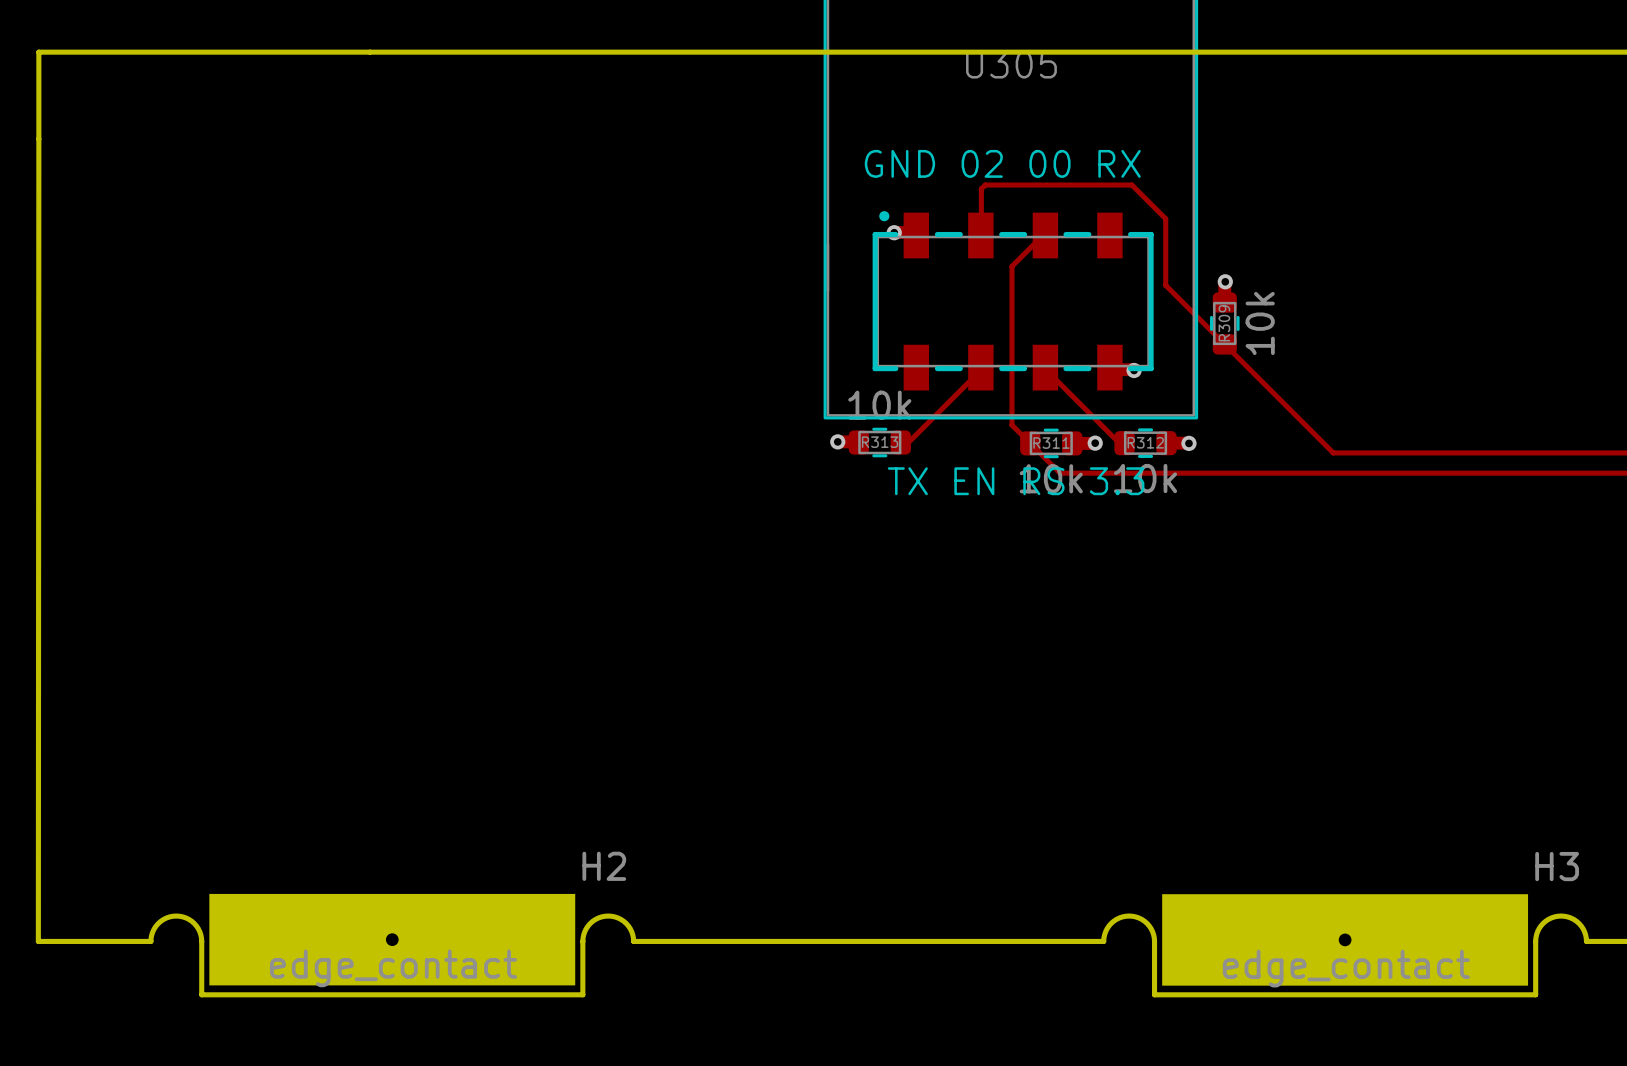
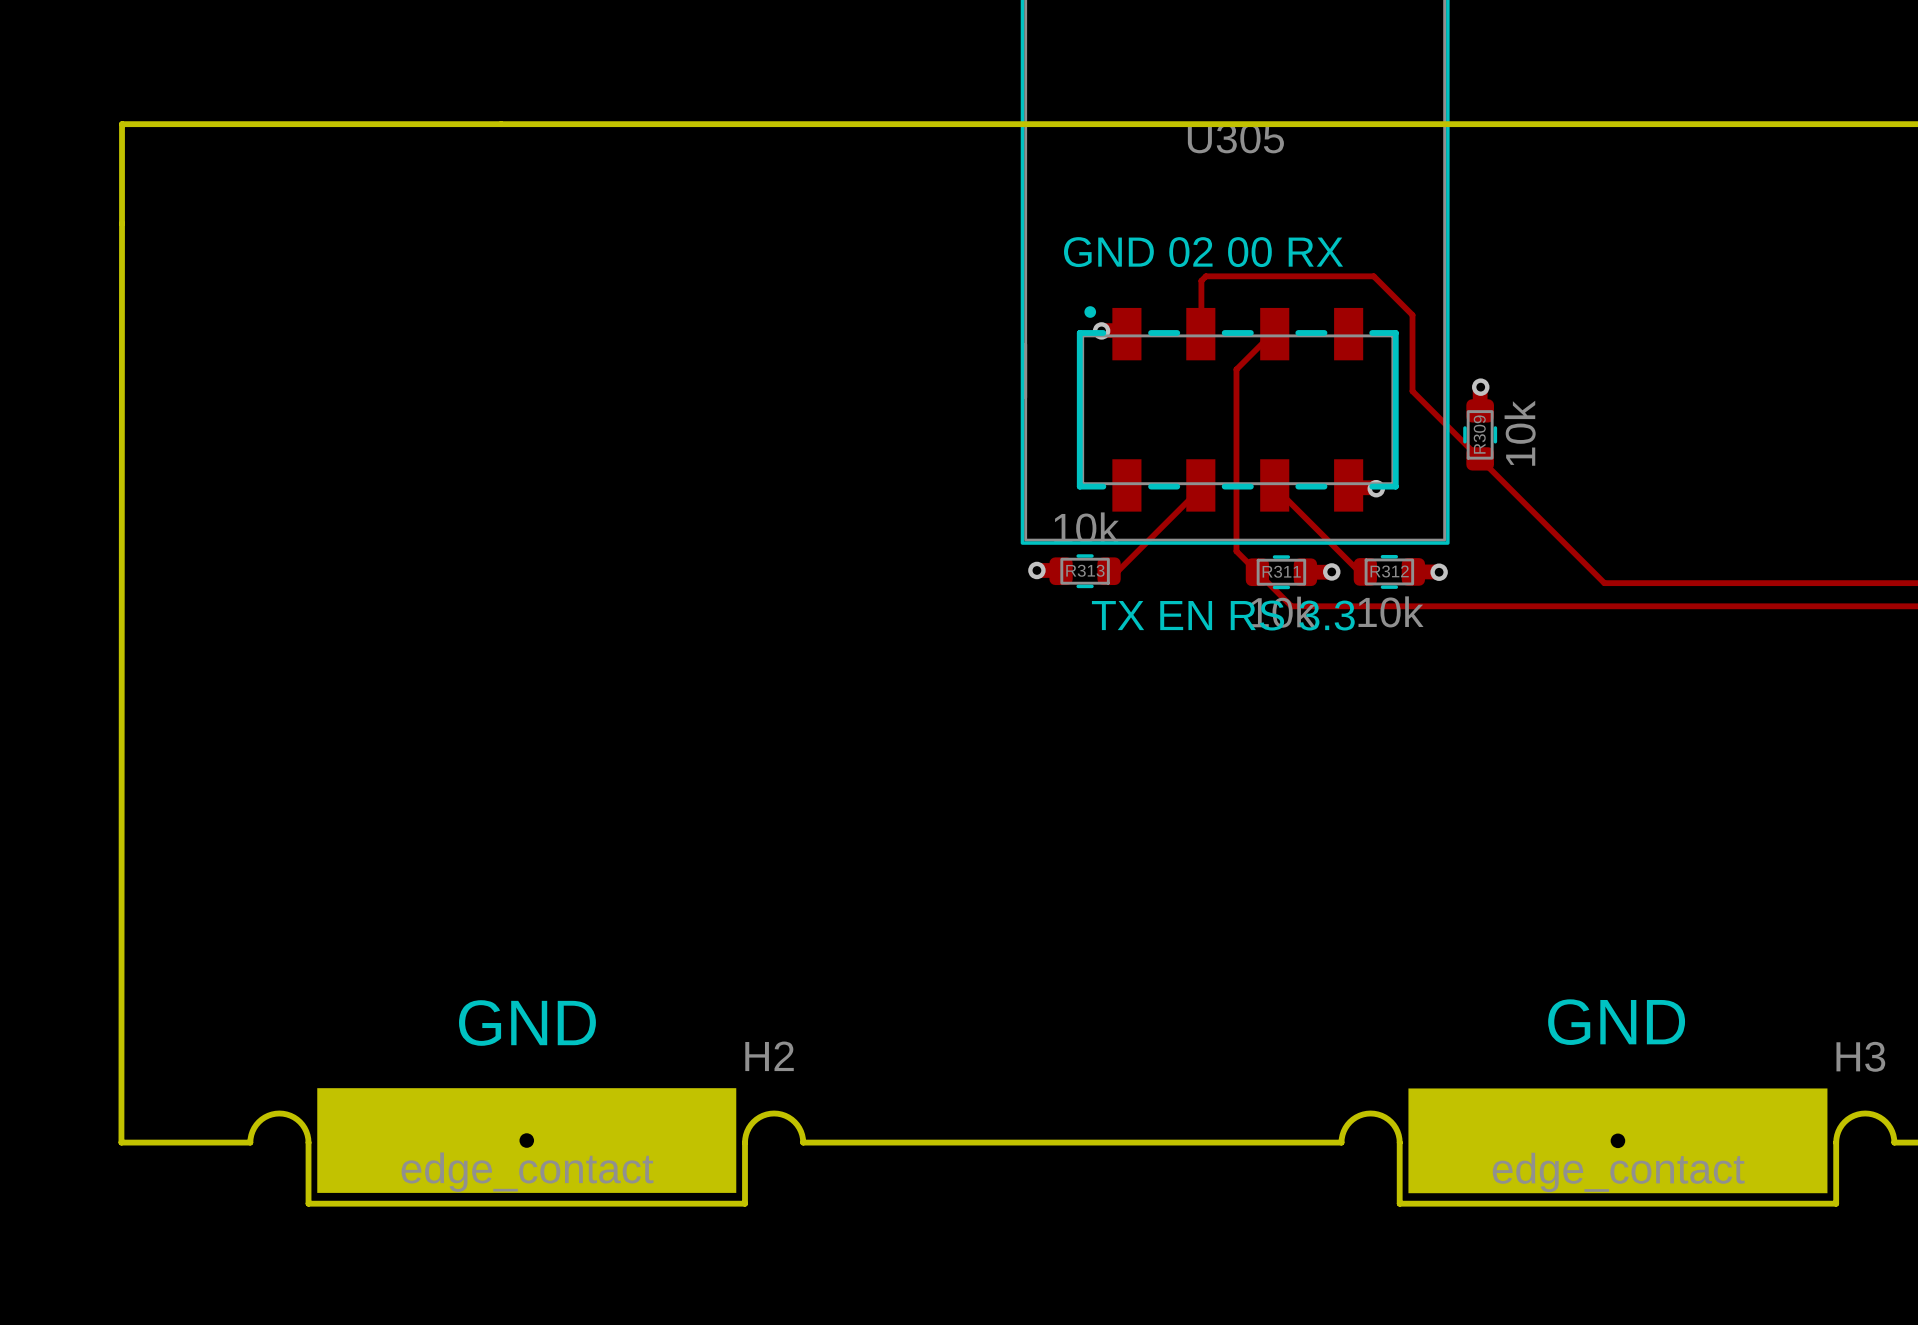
text: none -> GND (1616, 1022)
text: none -> GND (527, 1023)

